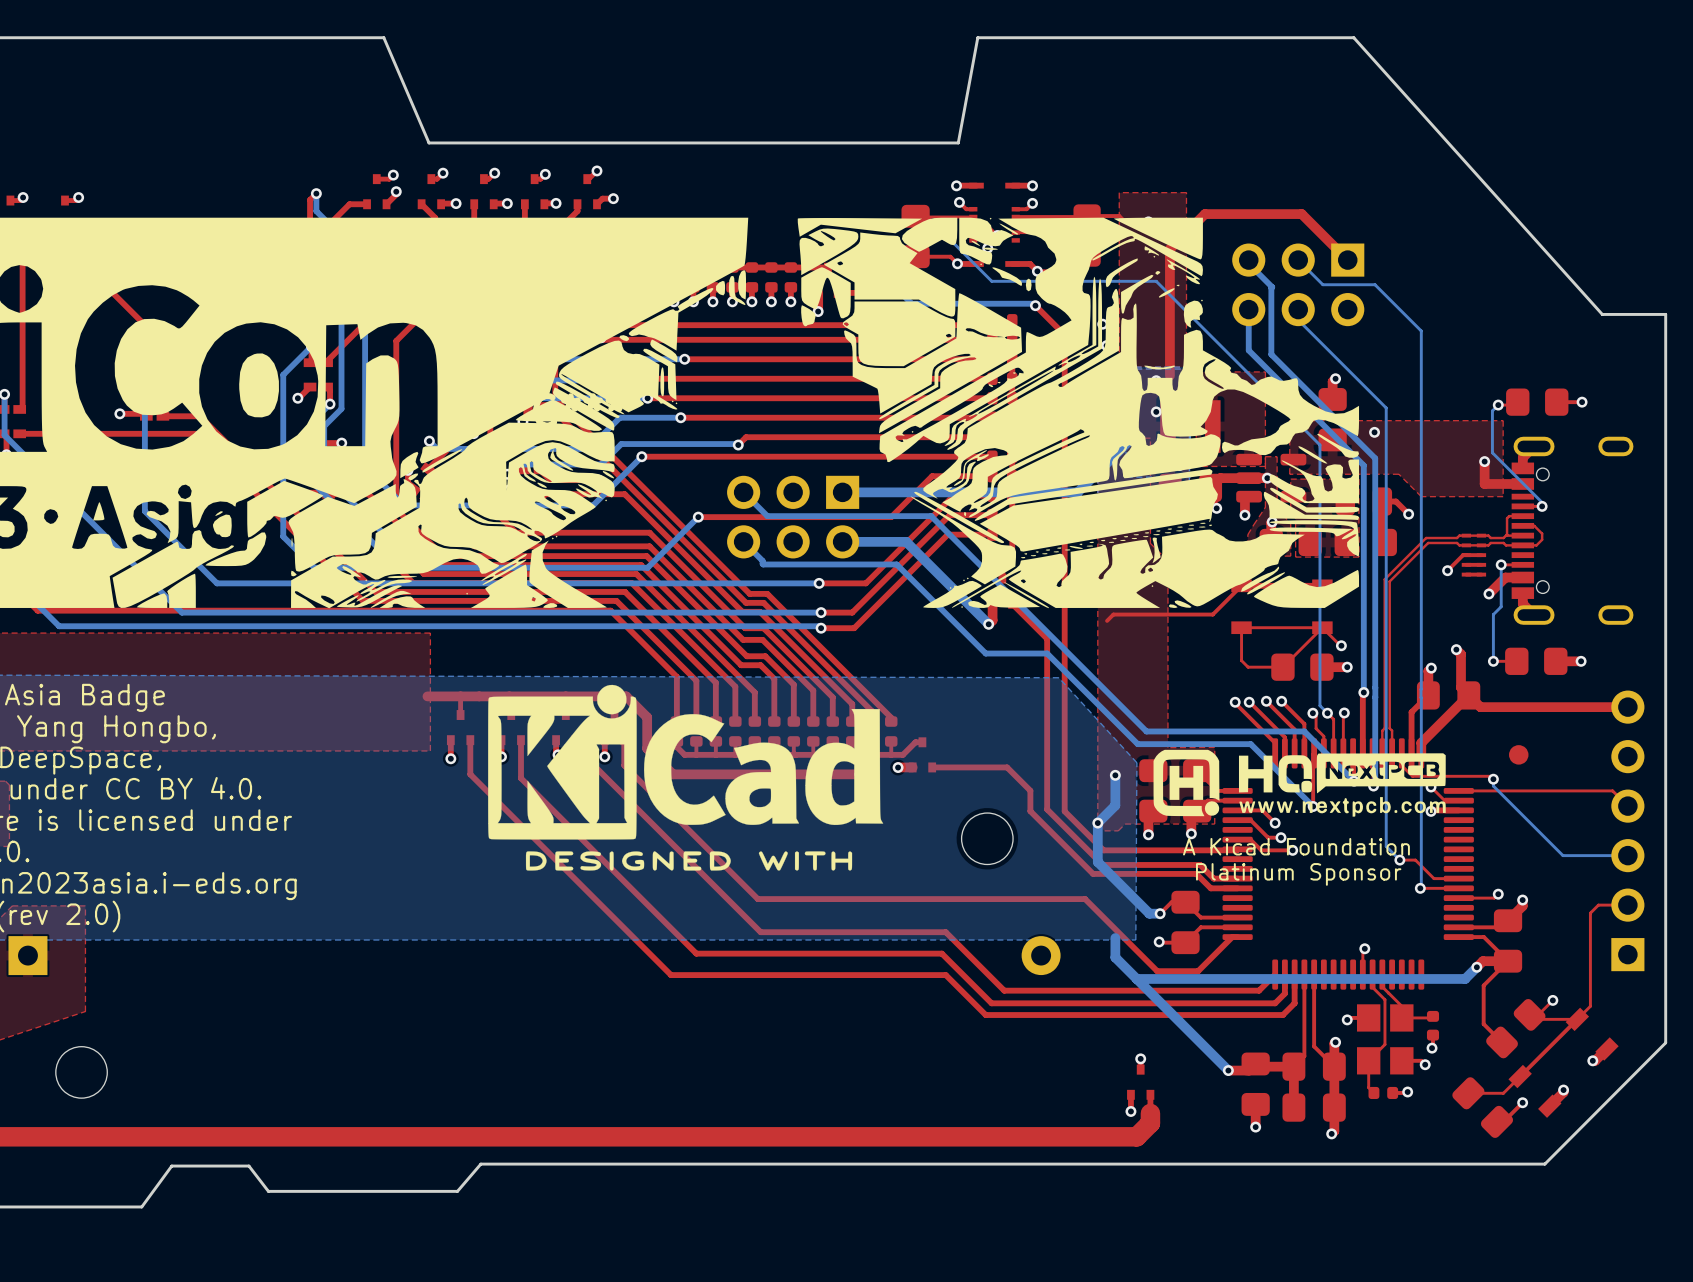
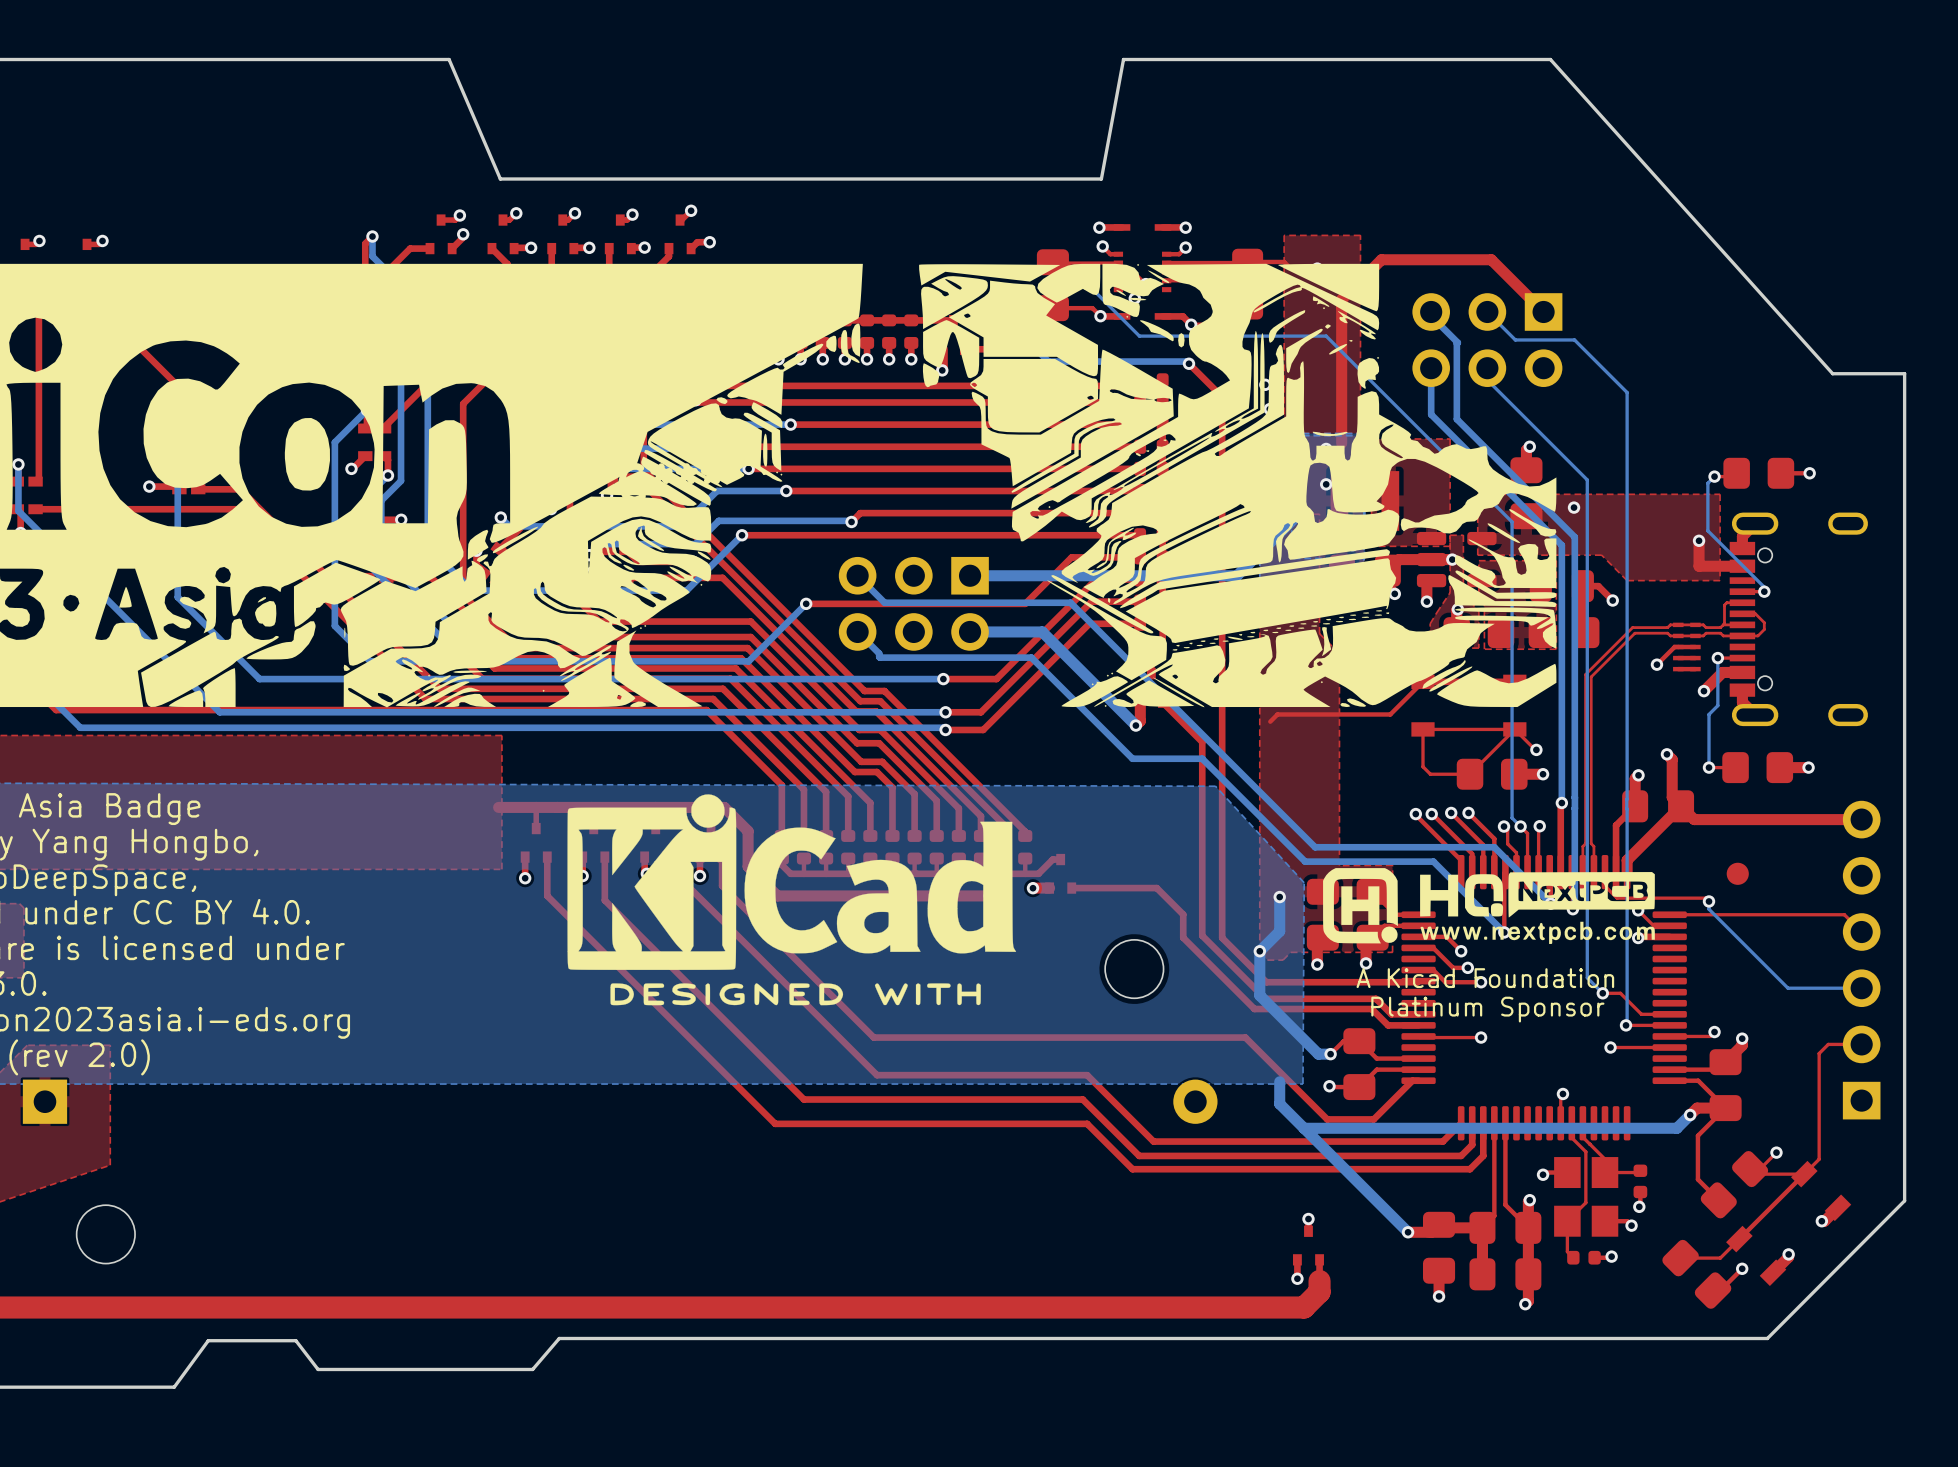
top track: none -> (1418, 1036) (1481, 1037)
via: none -> (1481, 1037)
via: none -> (1610, 1047)
top track: none -> (1669, 1047) (1610, 1047)

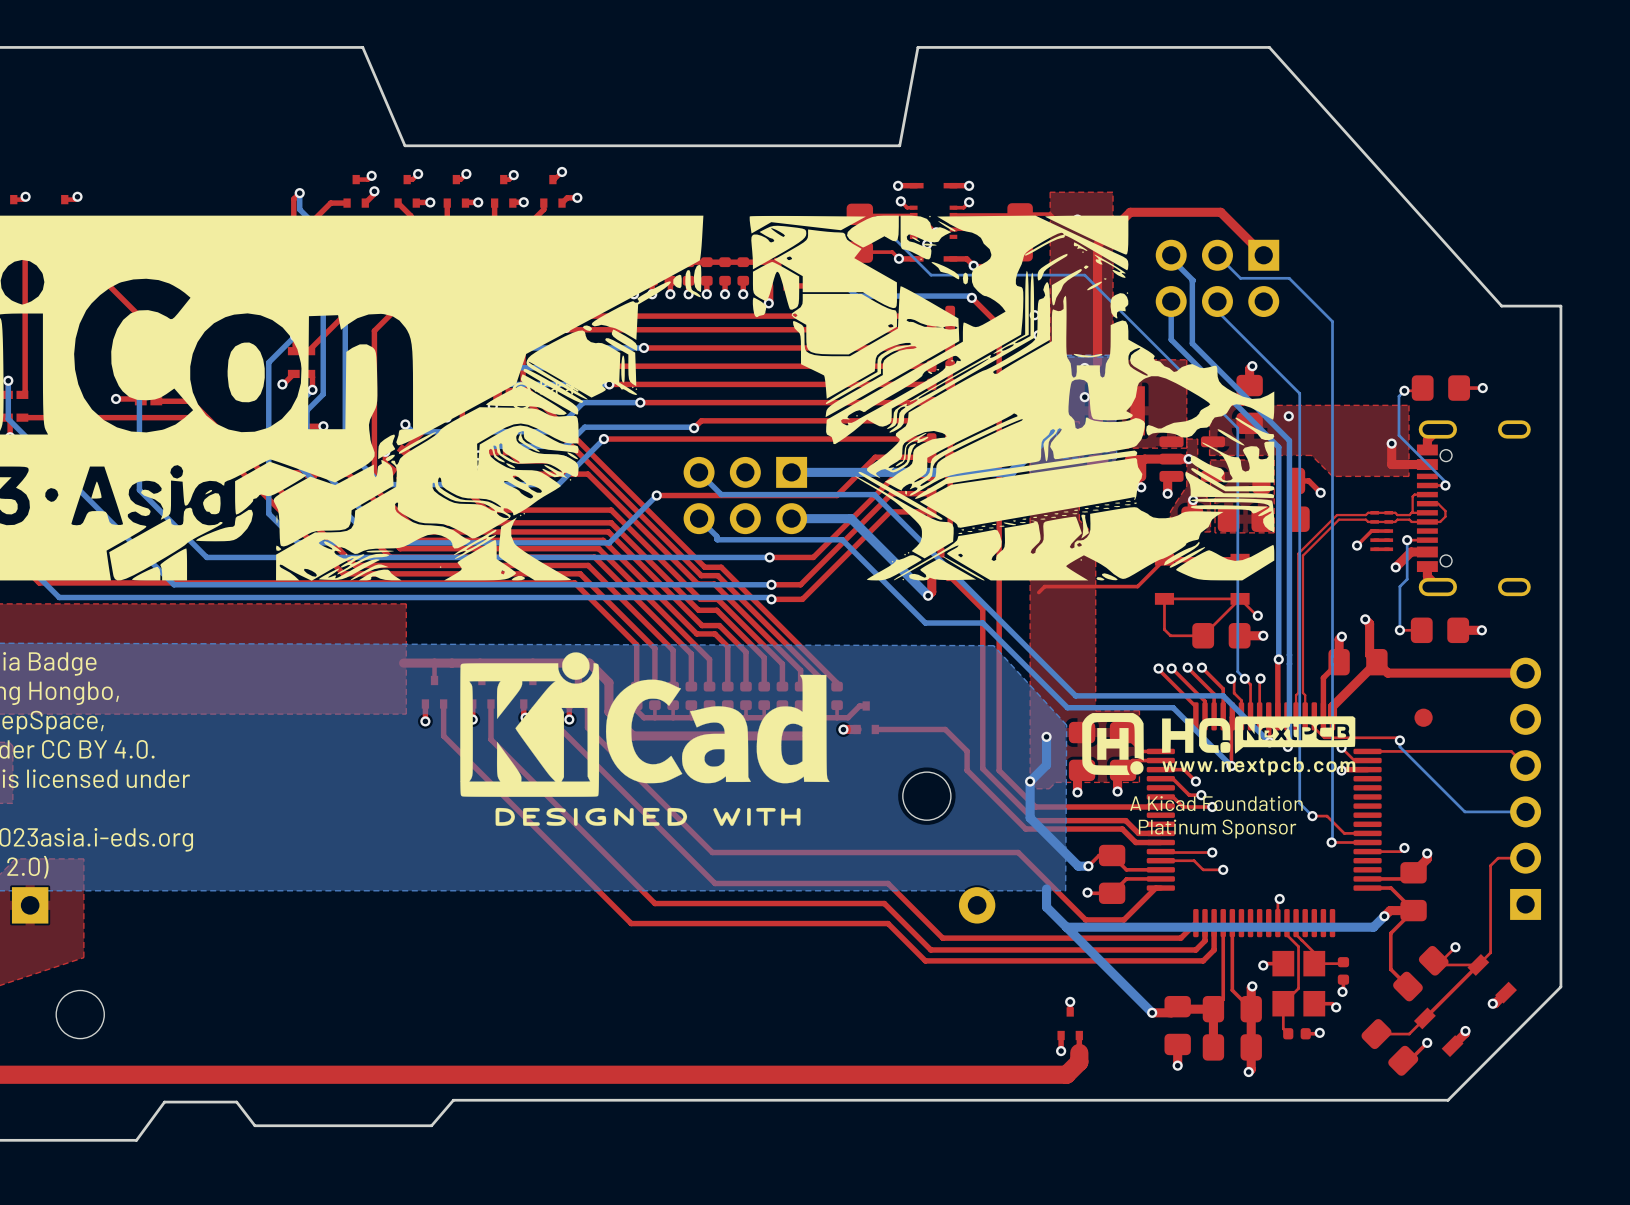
top track: none -> (1160, 860) (1194, 860) (1203, 869) (1223, 869)
via position: (1610, 1047) -> (1223, 869)
top track: (1669, 1047) (1610, 1047) -> none

